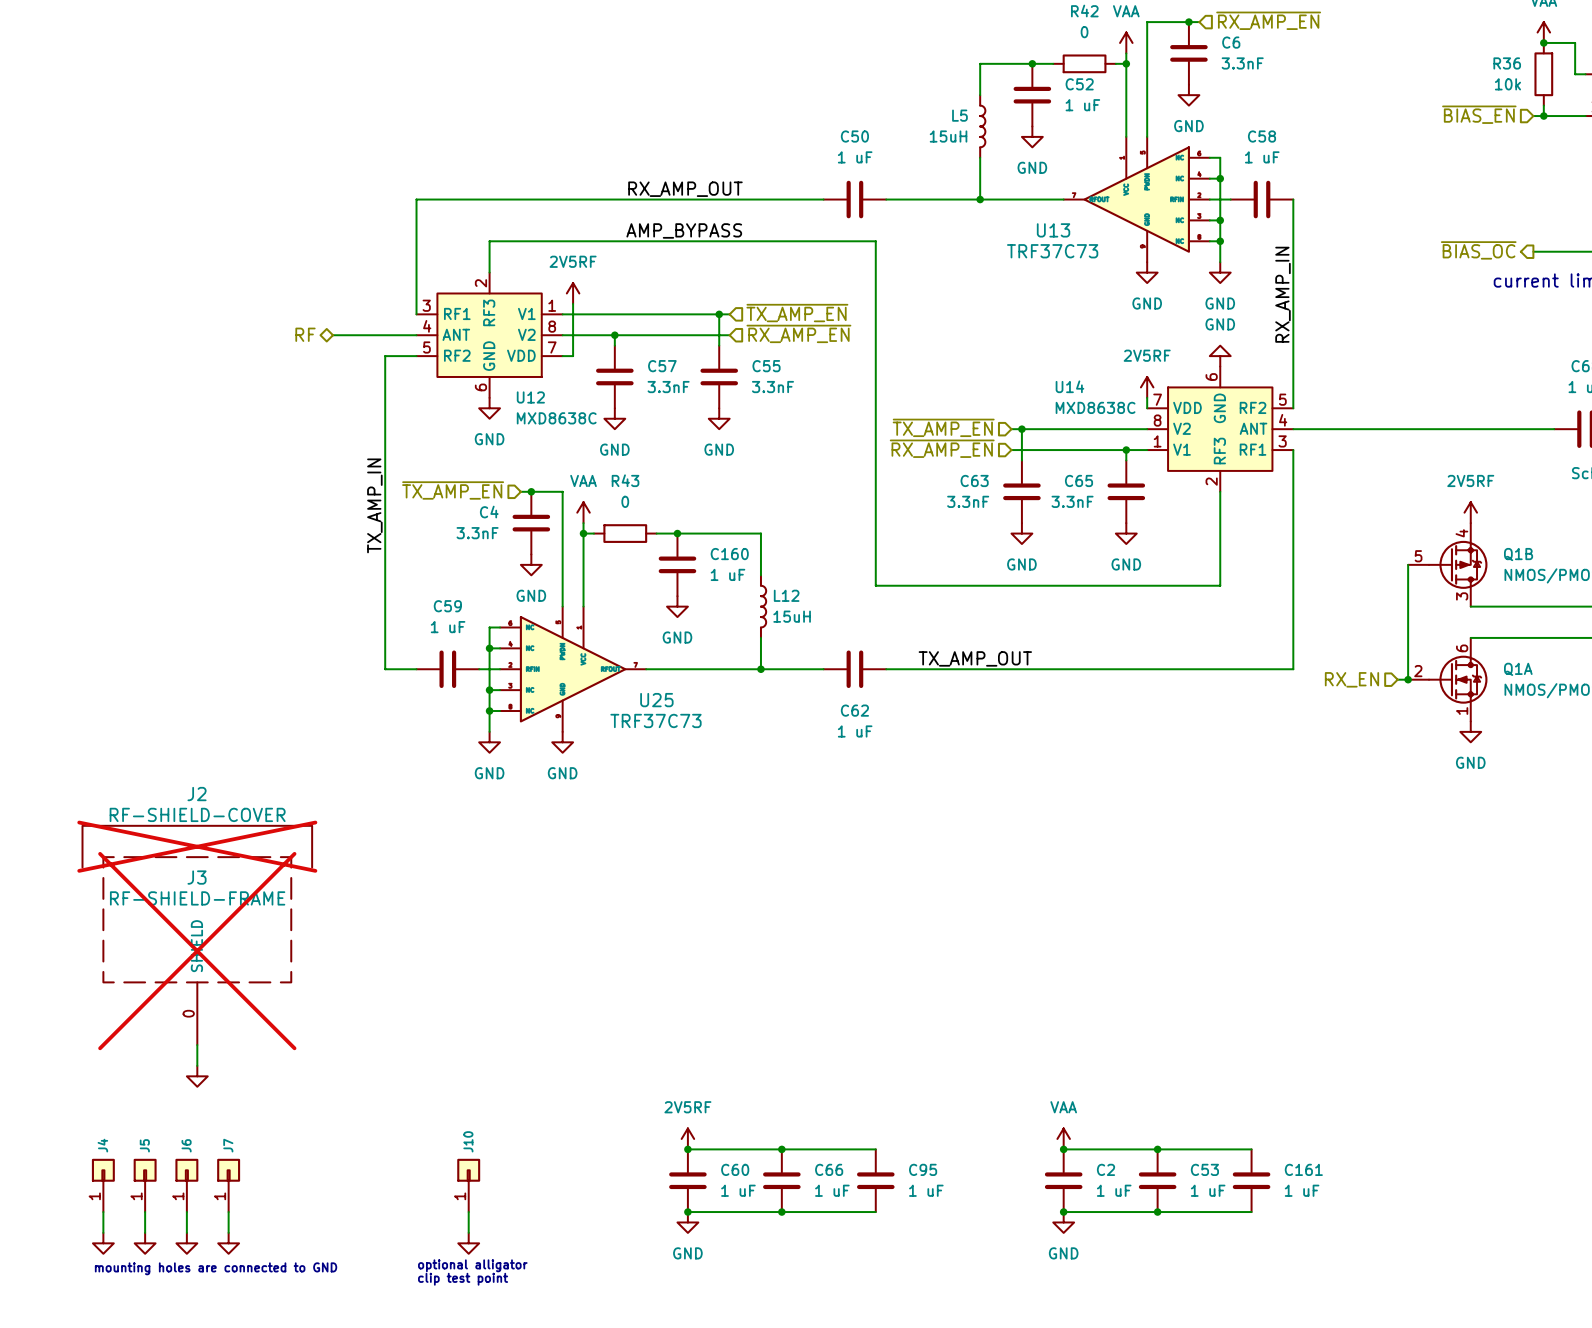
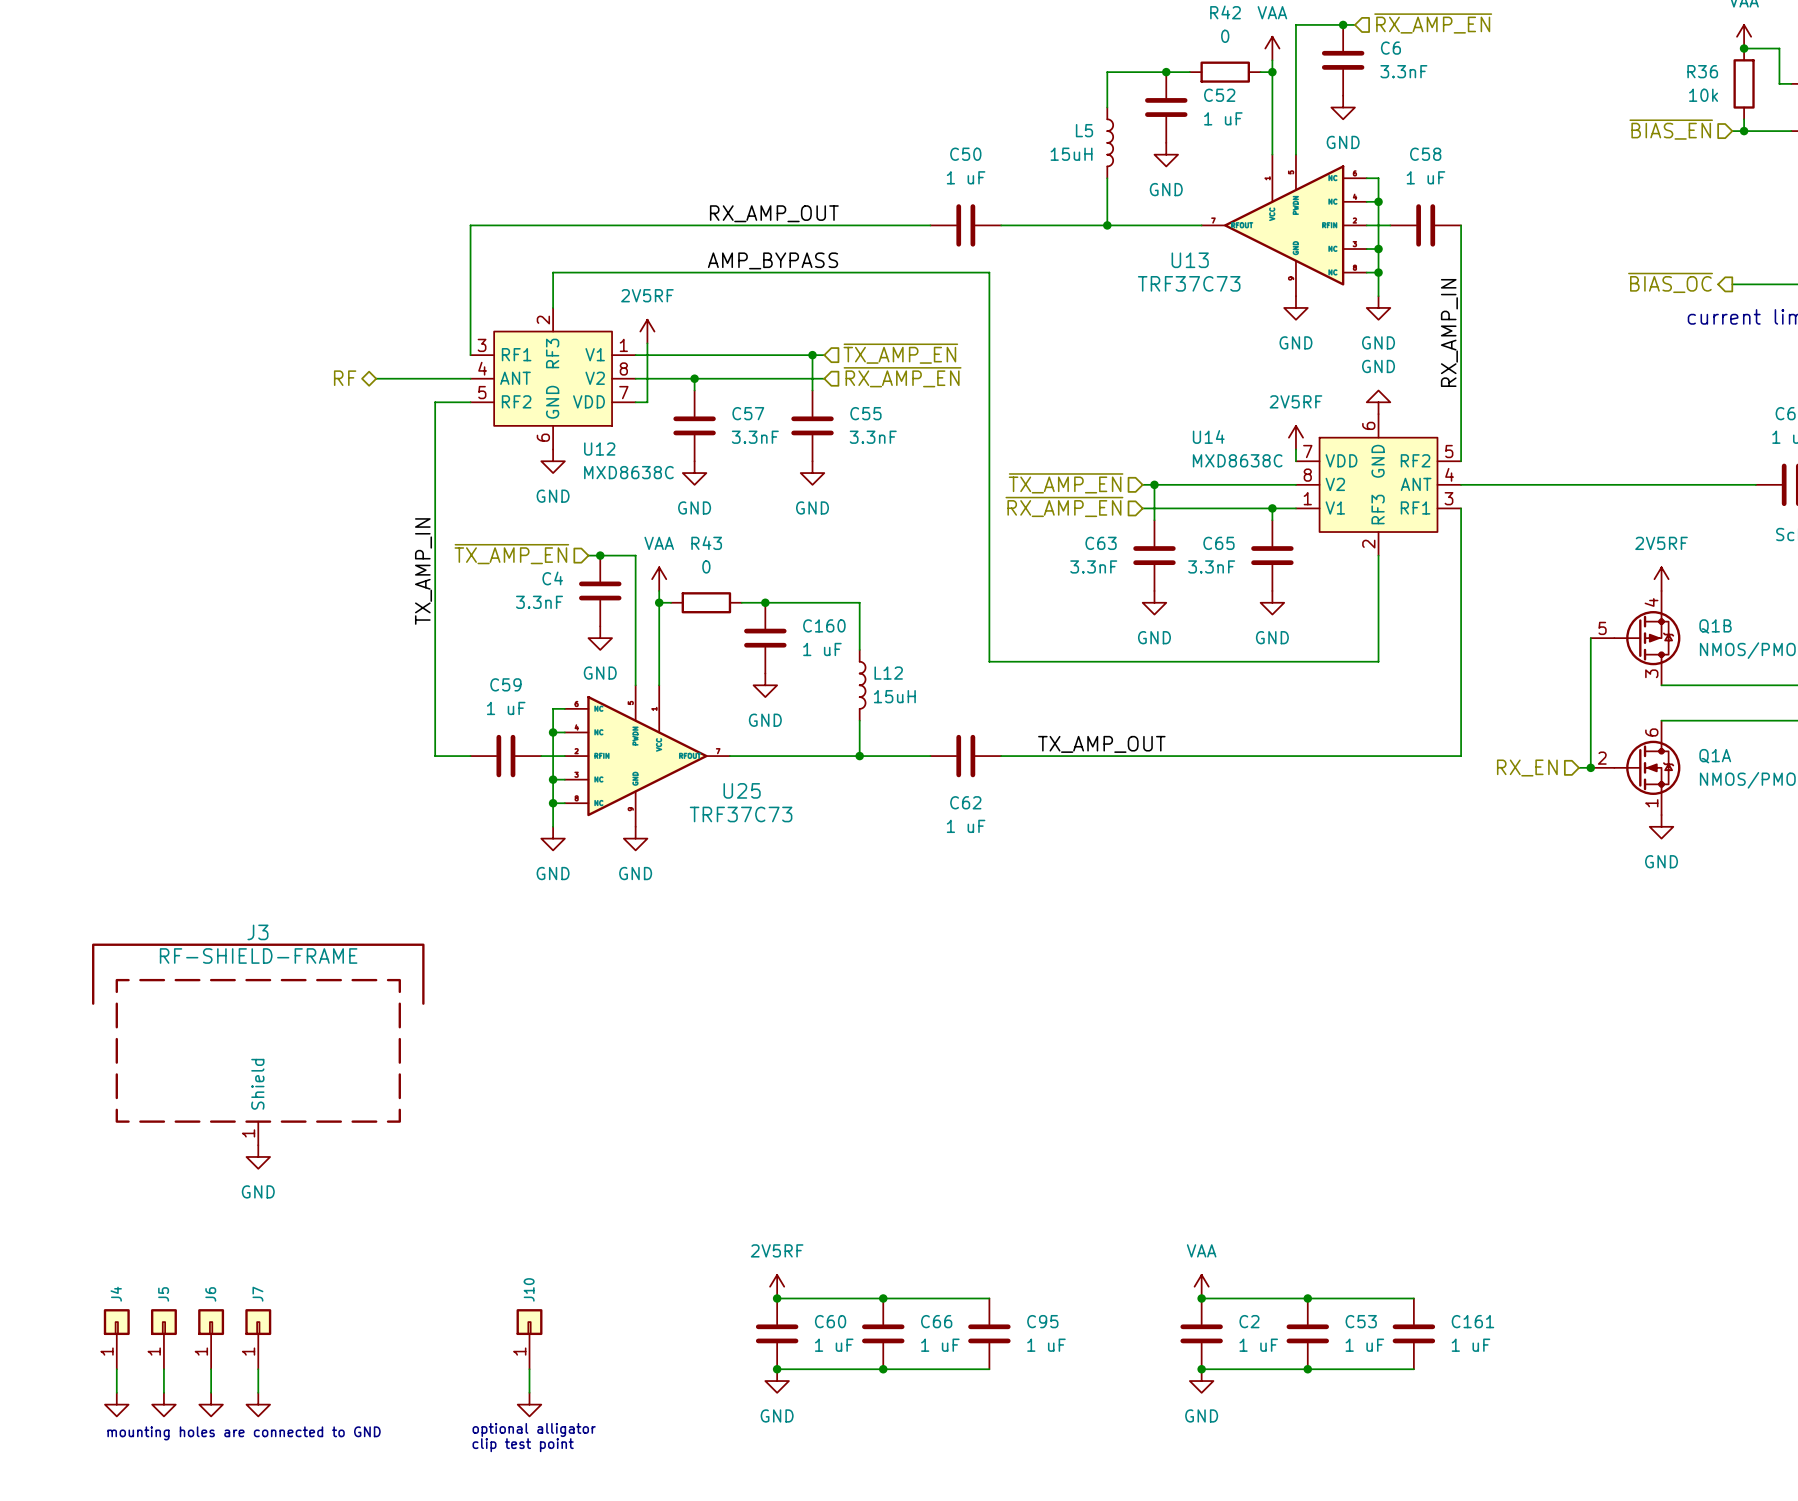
J2: RF-SHIELD-COVER (197, 846) -> none
J3 symbol: [103, 857, 292, 1046] -> [92, 943, 425, 1146]
J3 name position: J3 (197, 877) -> J3 (257, 932)
J3 value position: RF-SHIELD-FRAME (197, 898) -> RF-SHIELD-FRAME (258, 955)
J3 do-not-place cross: (197, 951) -> none
power symbol: none -> GND (258, 1156)
wire: (197, 1045) (197, 1065) -> none
power symbol: (197, 1076) -> none

